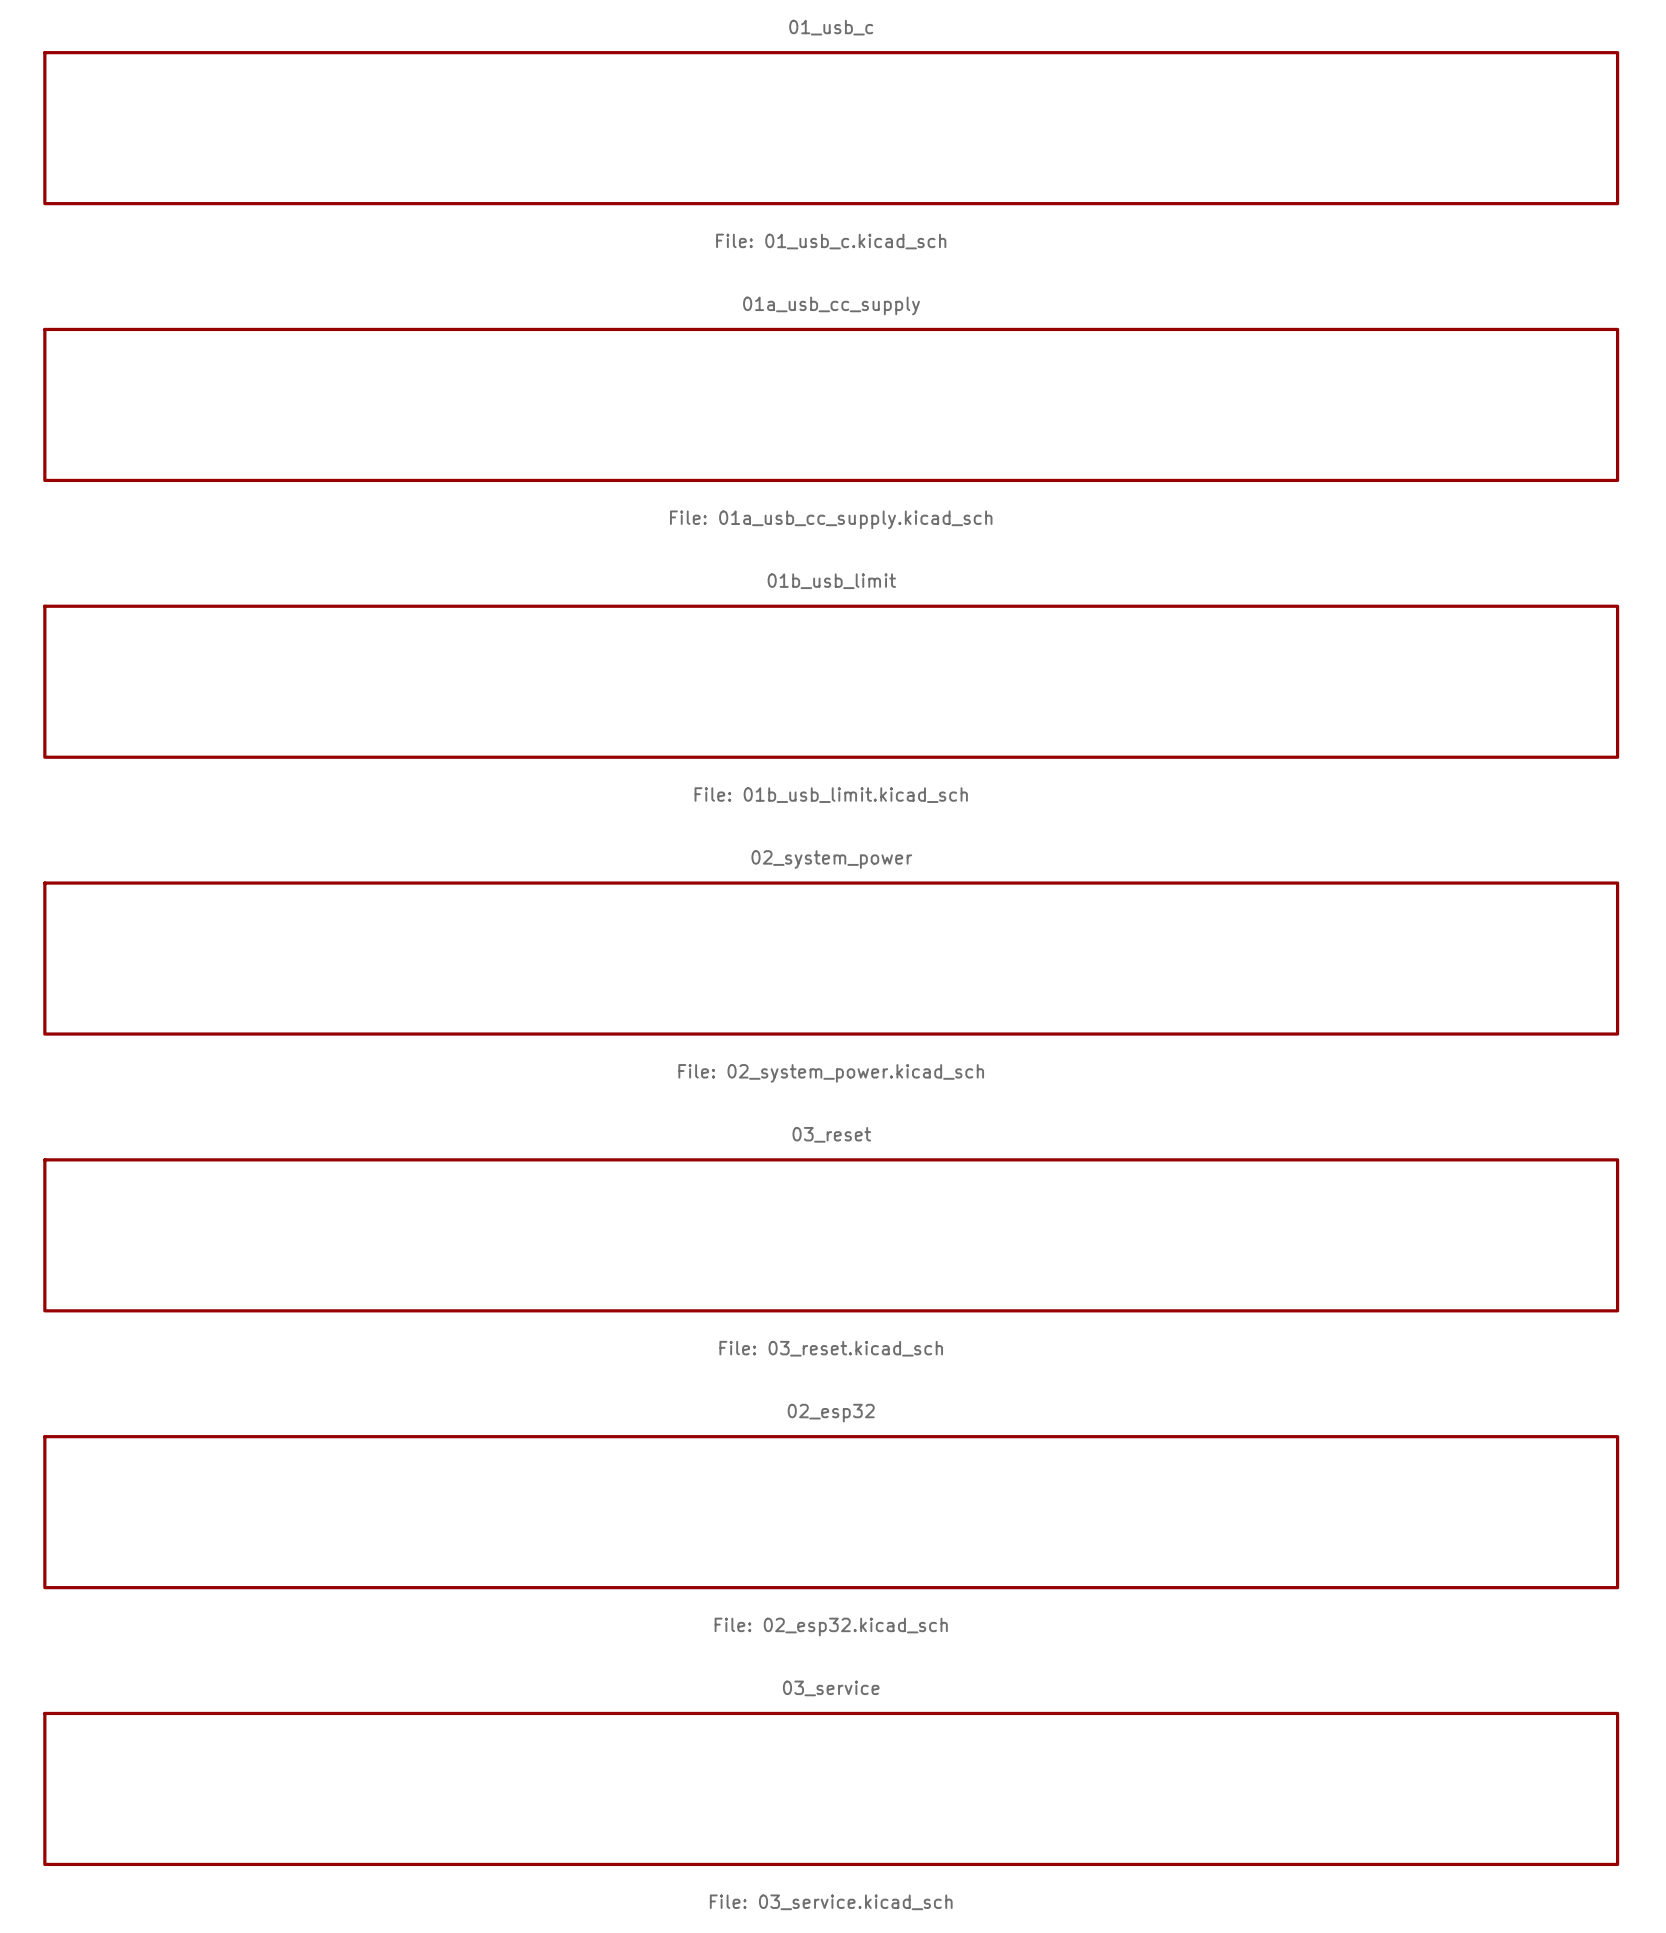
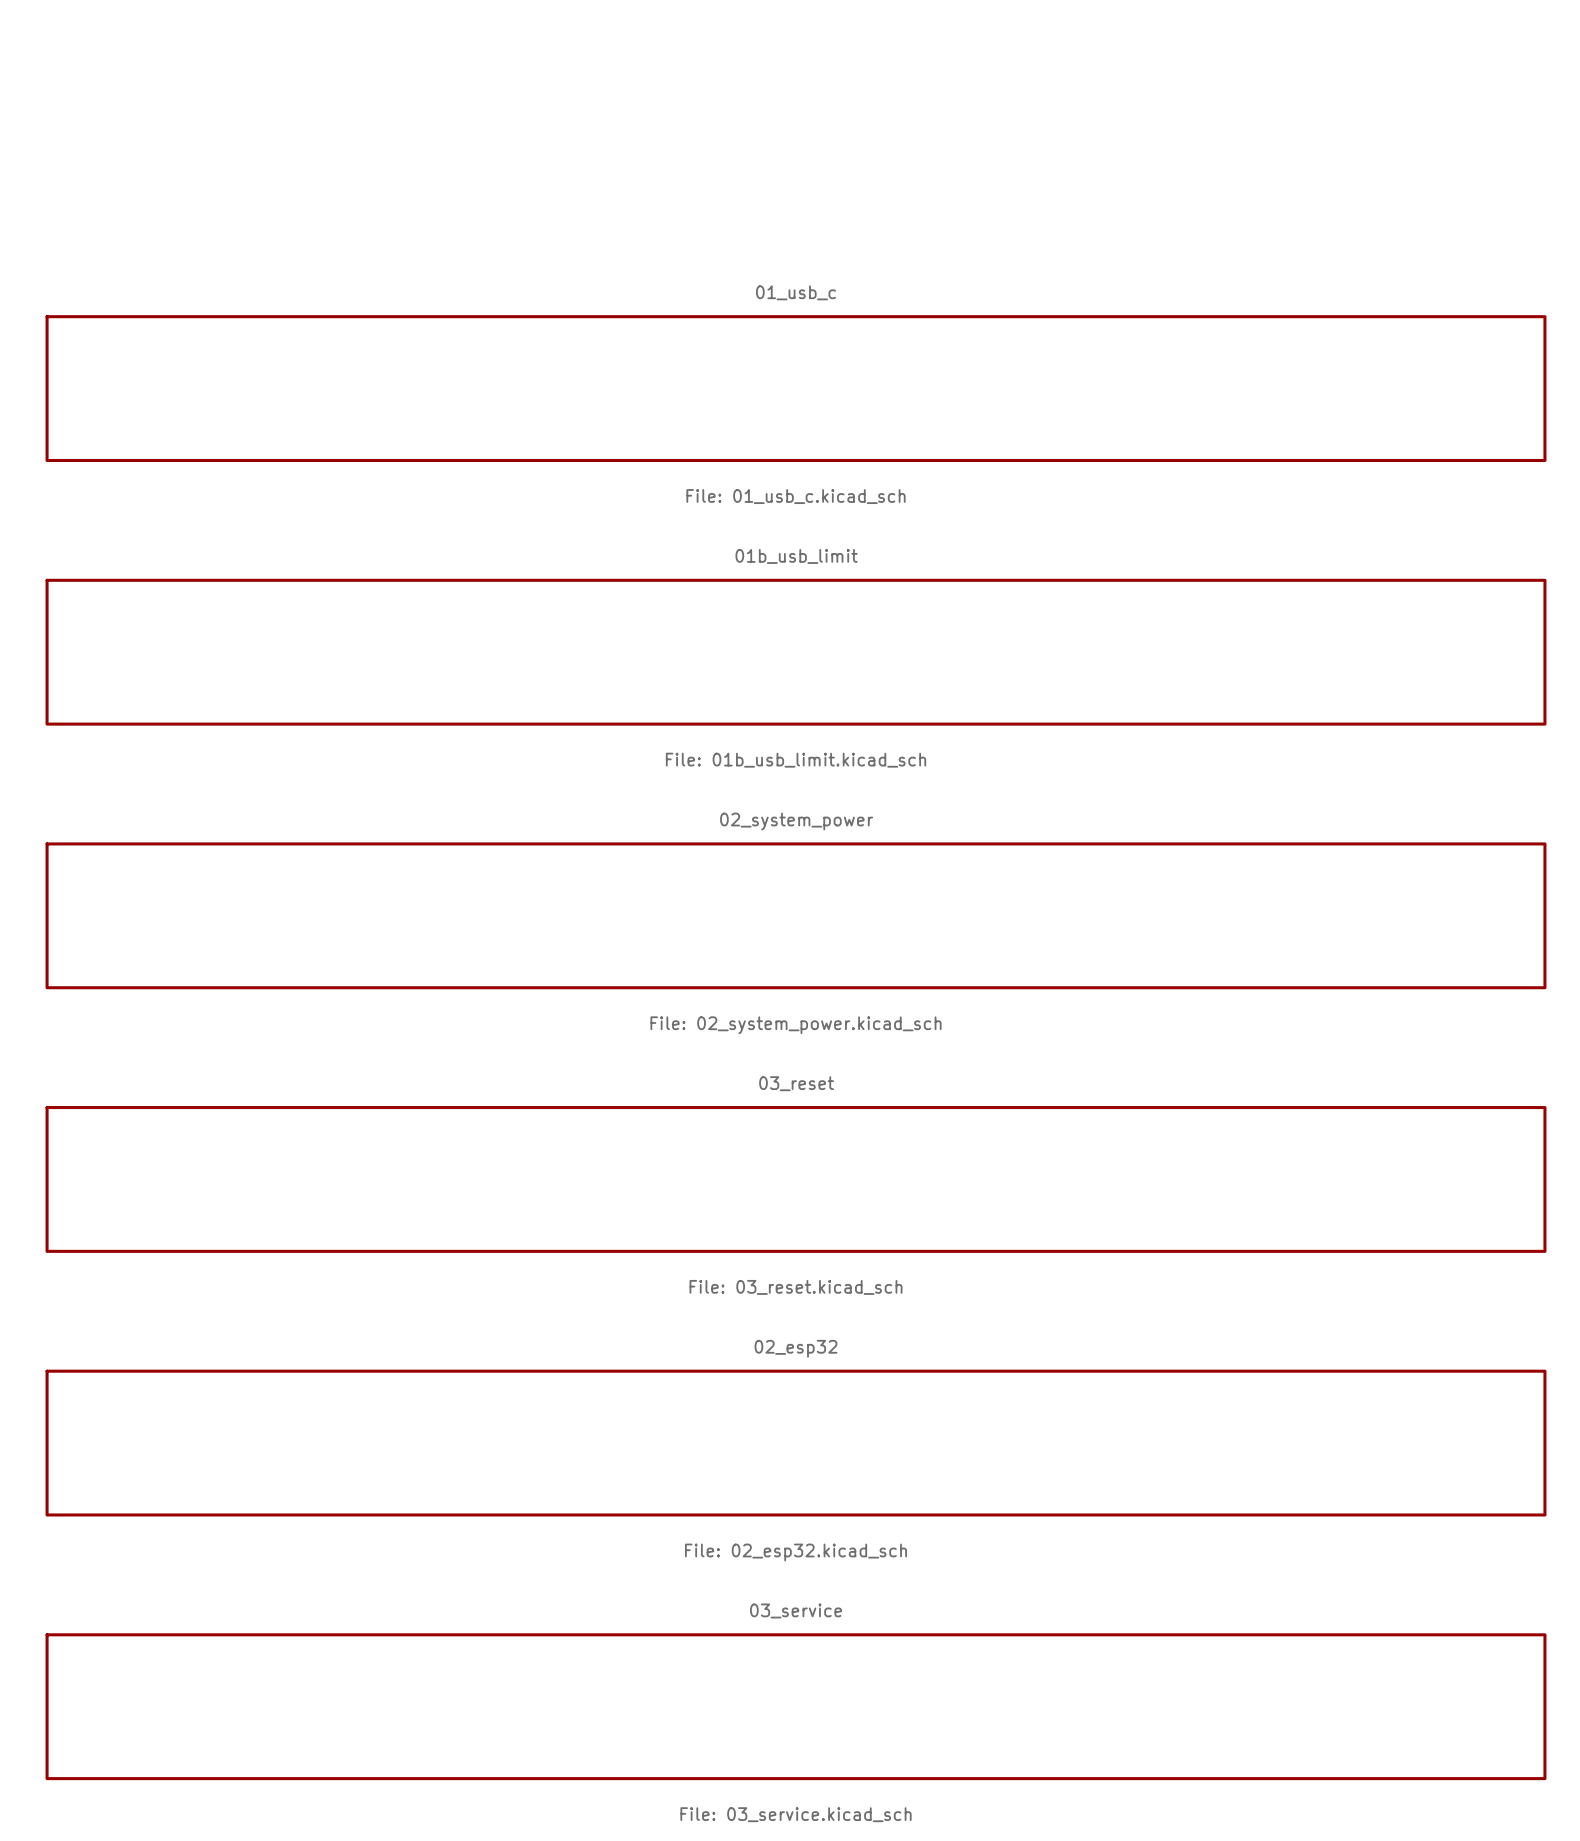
sheet 01_usb_c: File: 01_usb_c.kicad_sch (831, 128) -> none
sheet 01a_usb_cc_supply name: 01a_usb_cc_supply (831, 305) -> 01_usb_c (796, 292)
sheet 01a_usb_cc_supply value: File: 01a_usb_cc_supply.kicad_sch (831, 519) -> File: 01_usb_c.kicad_sch (796, 496)

